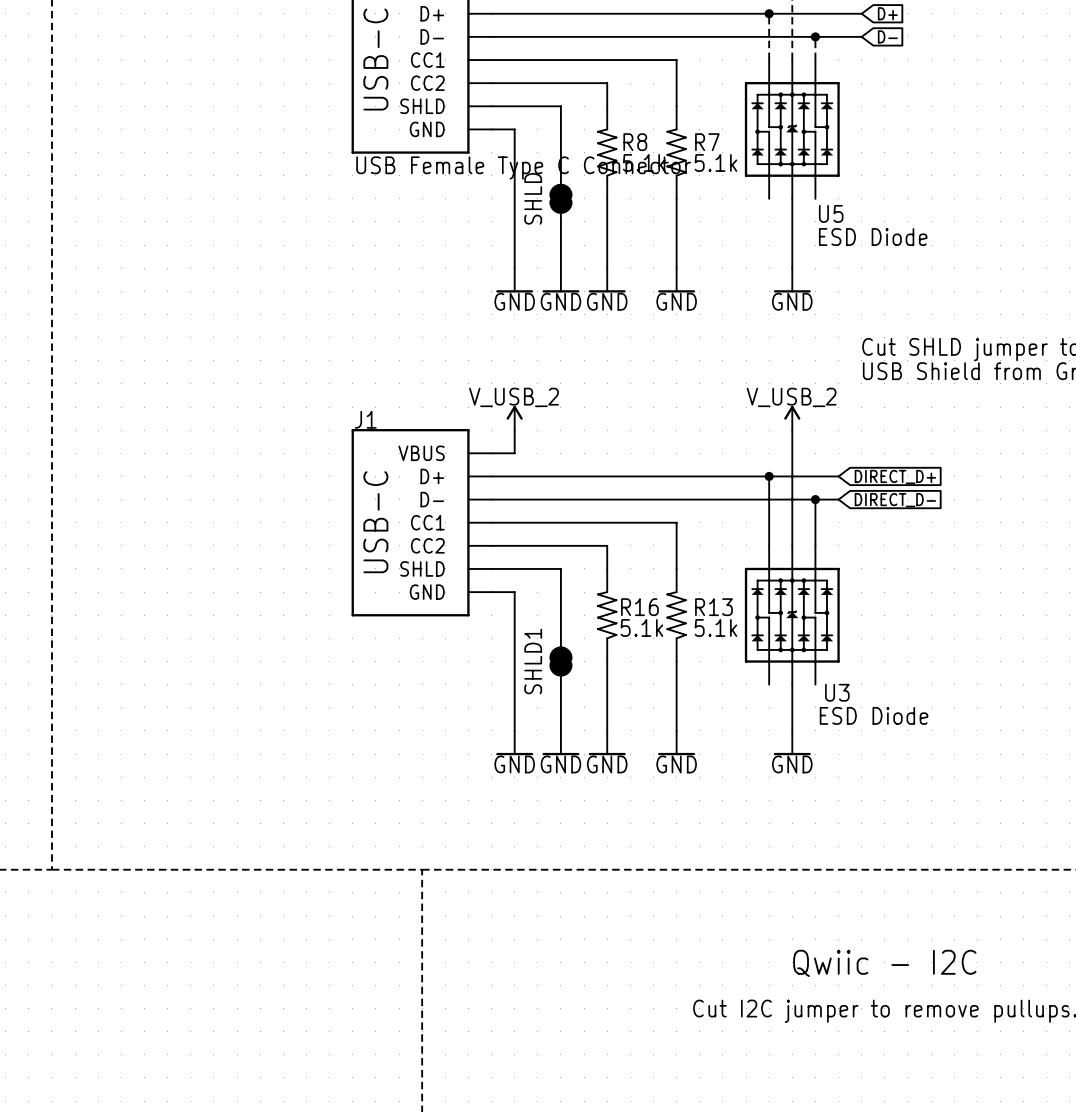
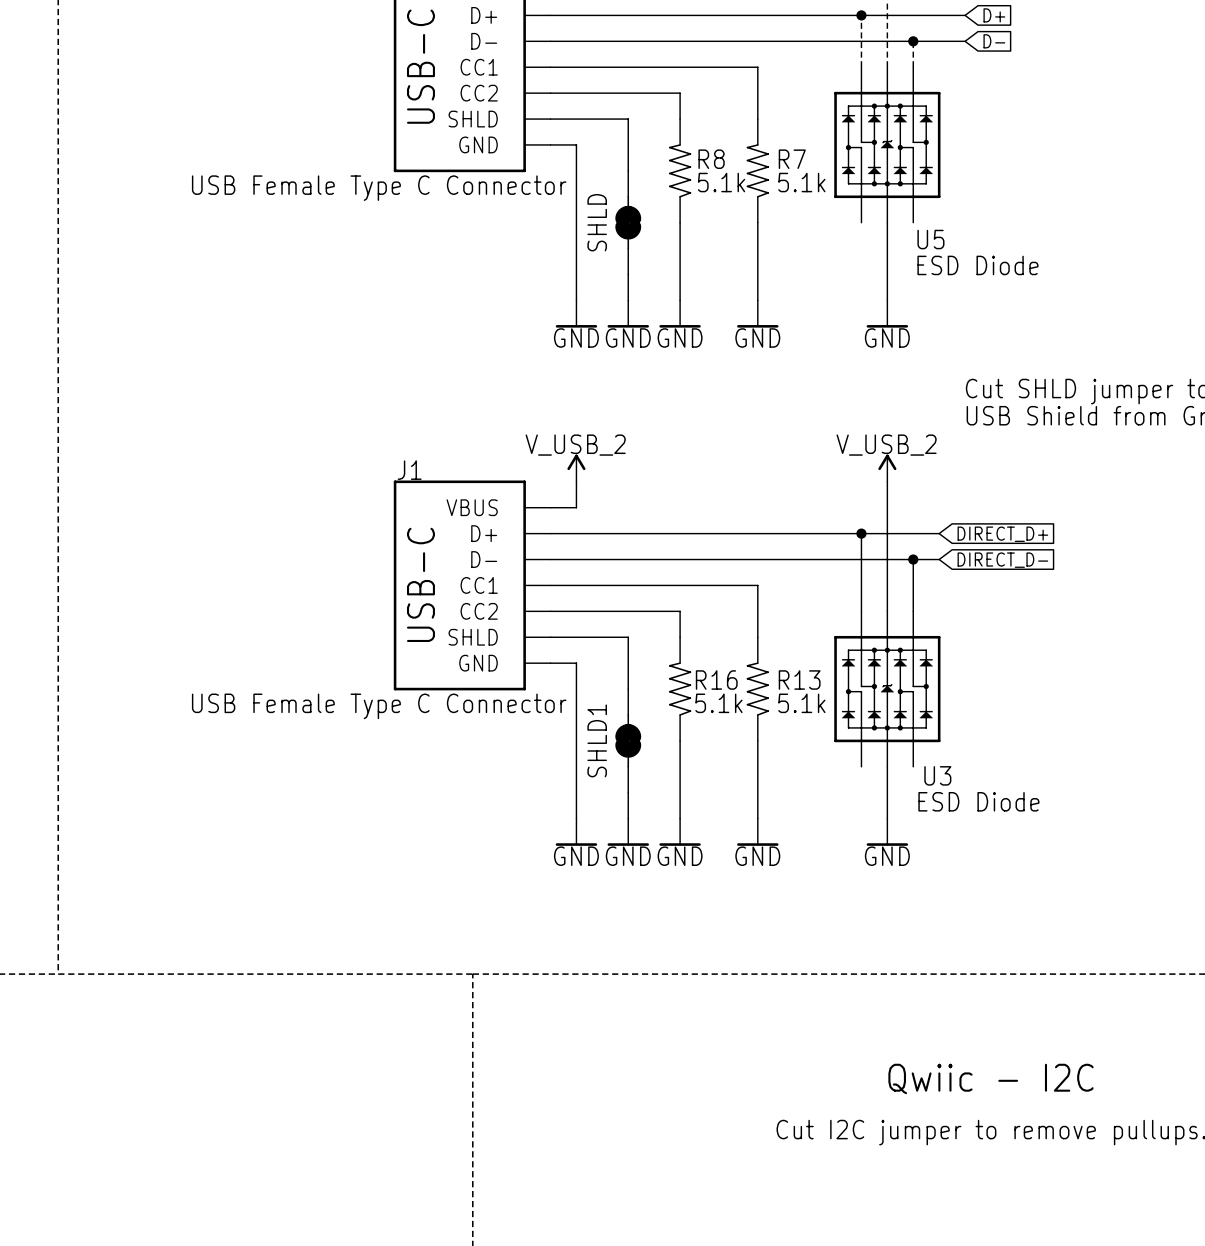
part value position: USB Female Type C Connector (523, 167) -> USB Female Type C Connector (379, 188)
J1 value: none -> USB Female Type C Connector (379, 706)

